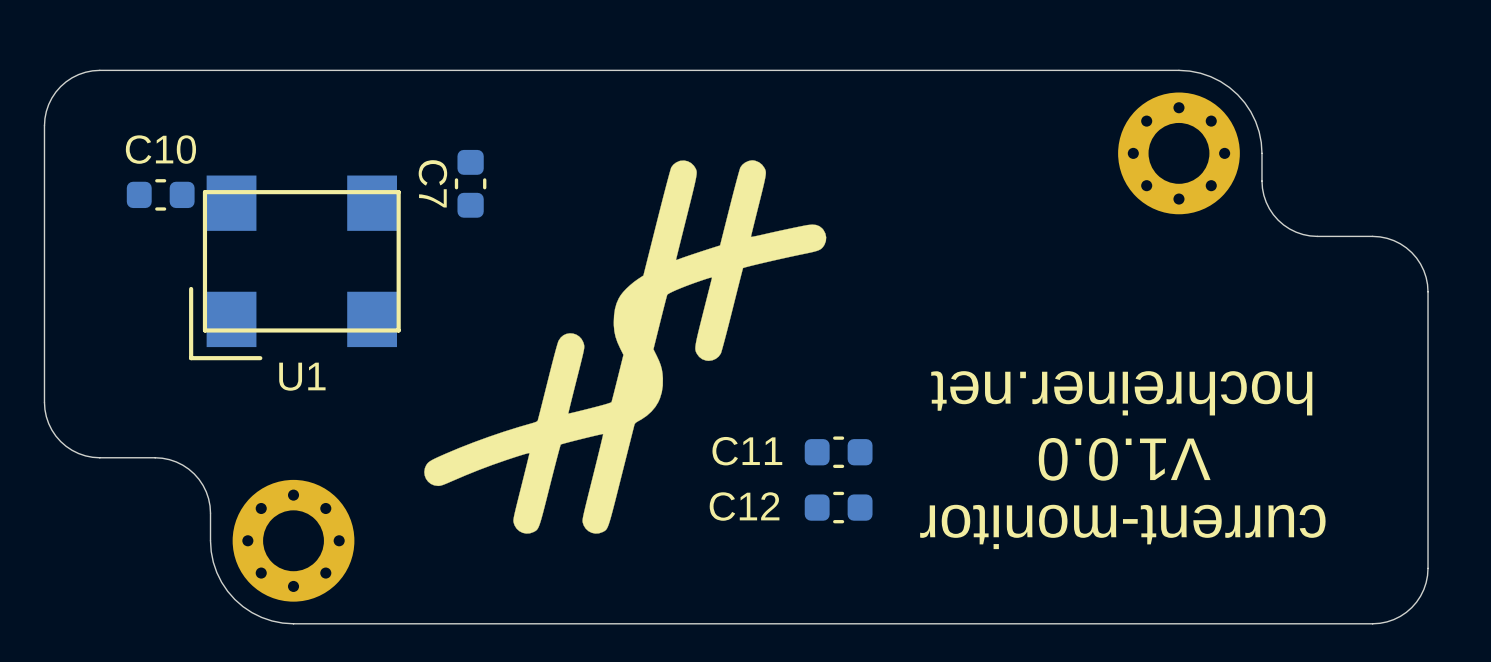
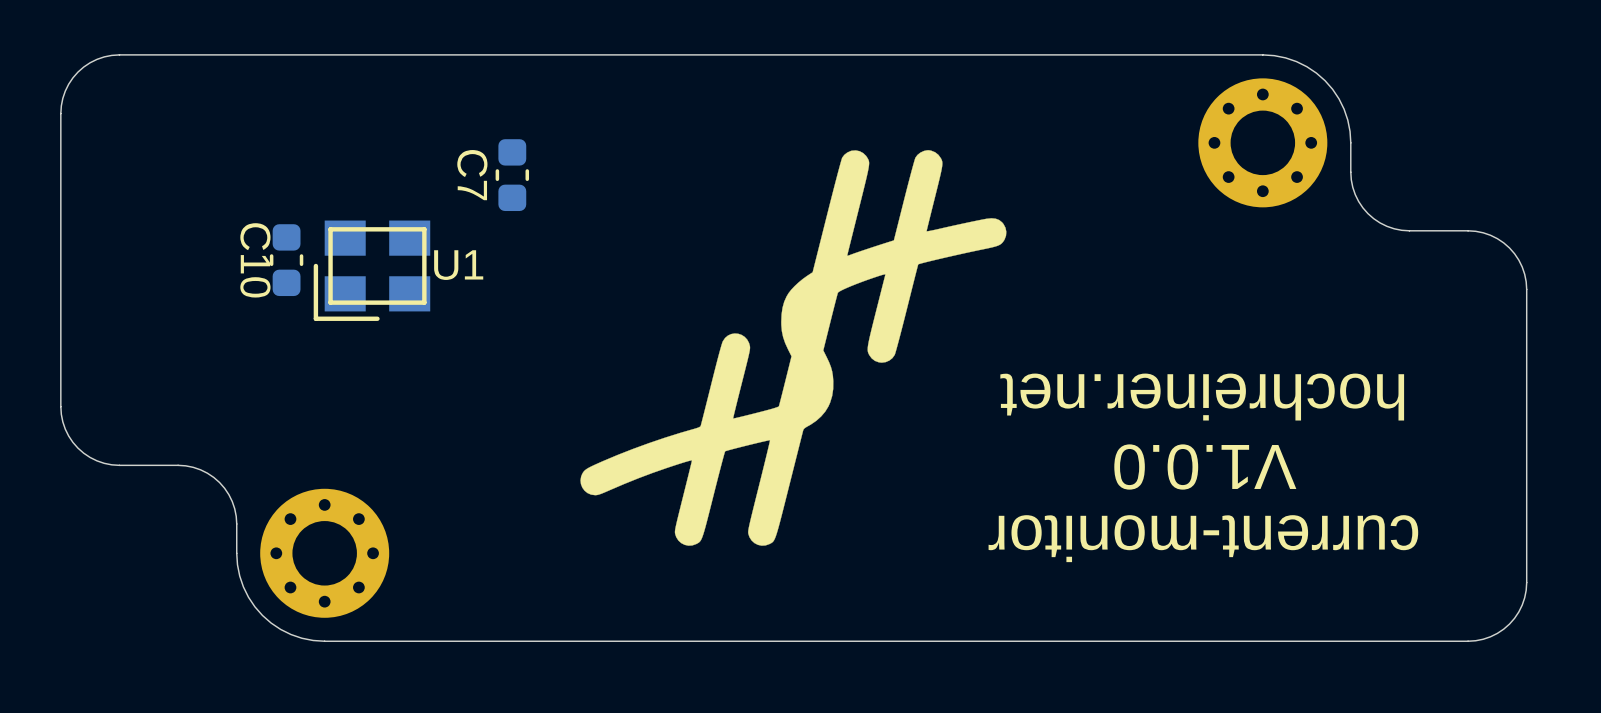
U1 footprint: [189, 175, 401, 361] -> [313, 220, 431, 321]
C10 rotation: 0° (160, 194) -> 90° clockwise (286, 260)
C10 position: (160, 194) -> (286, 260)
drawing position: (625, 346) -> (793, 347)
U1 name position: U1 (302, 376) -> U1 (458, 265)
C11: (838, 452) -> none
C12: (838, 507) -> none

